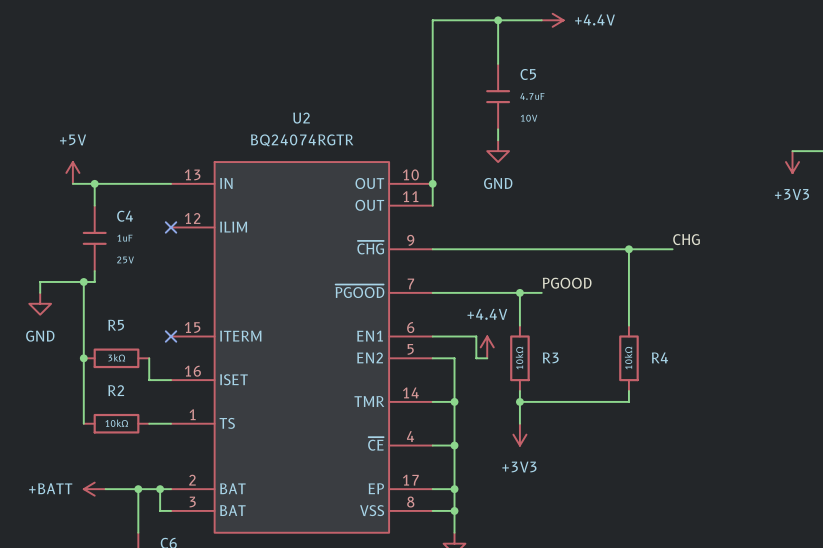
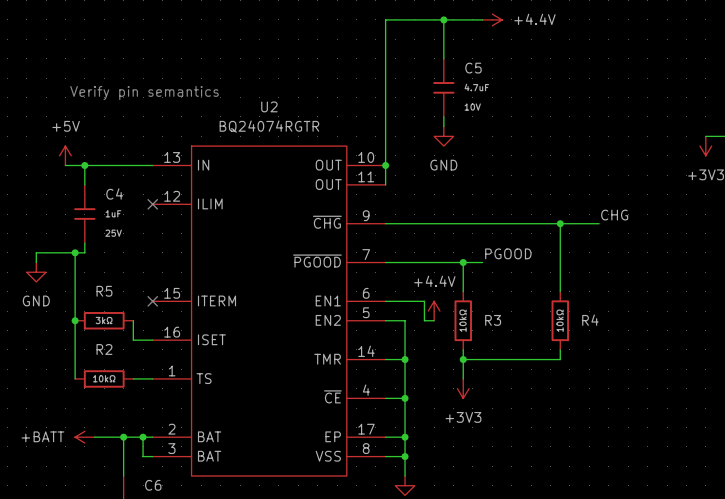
text: none -> Verify pin semantics (144, 93)

